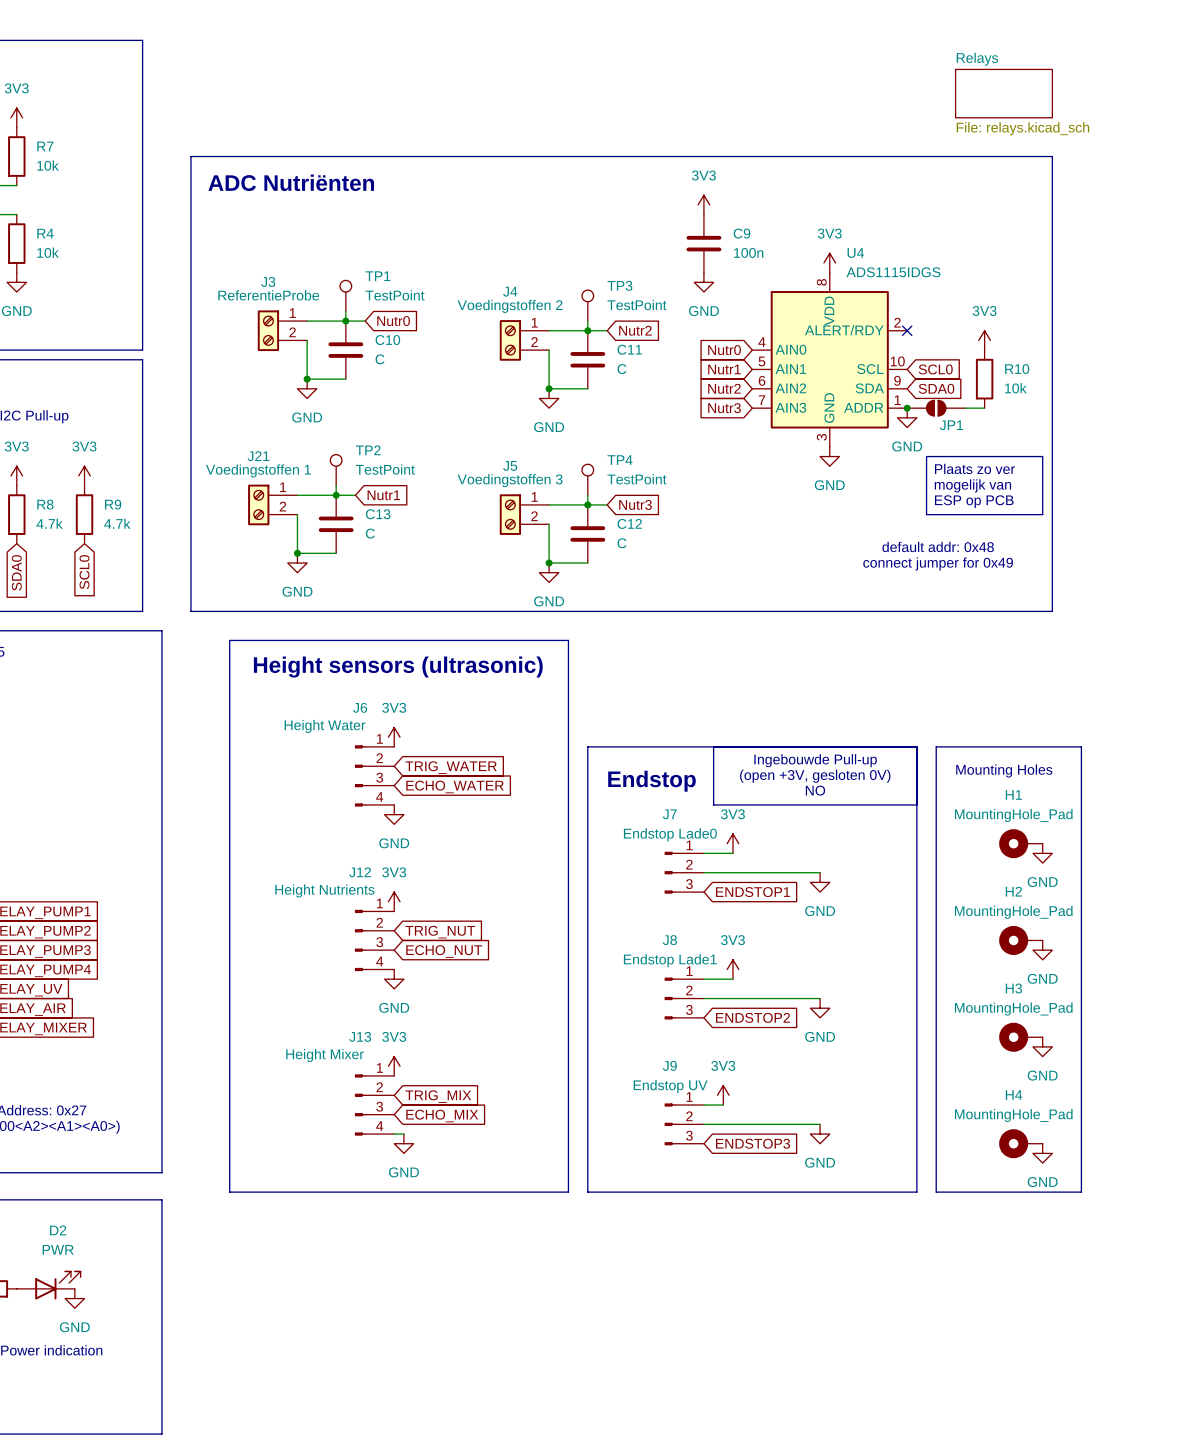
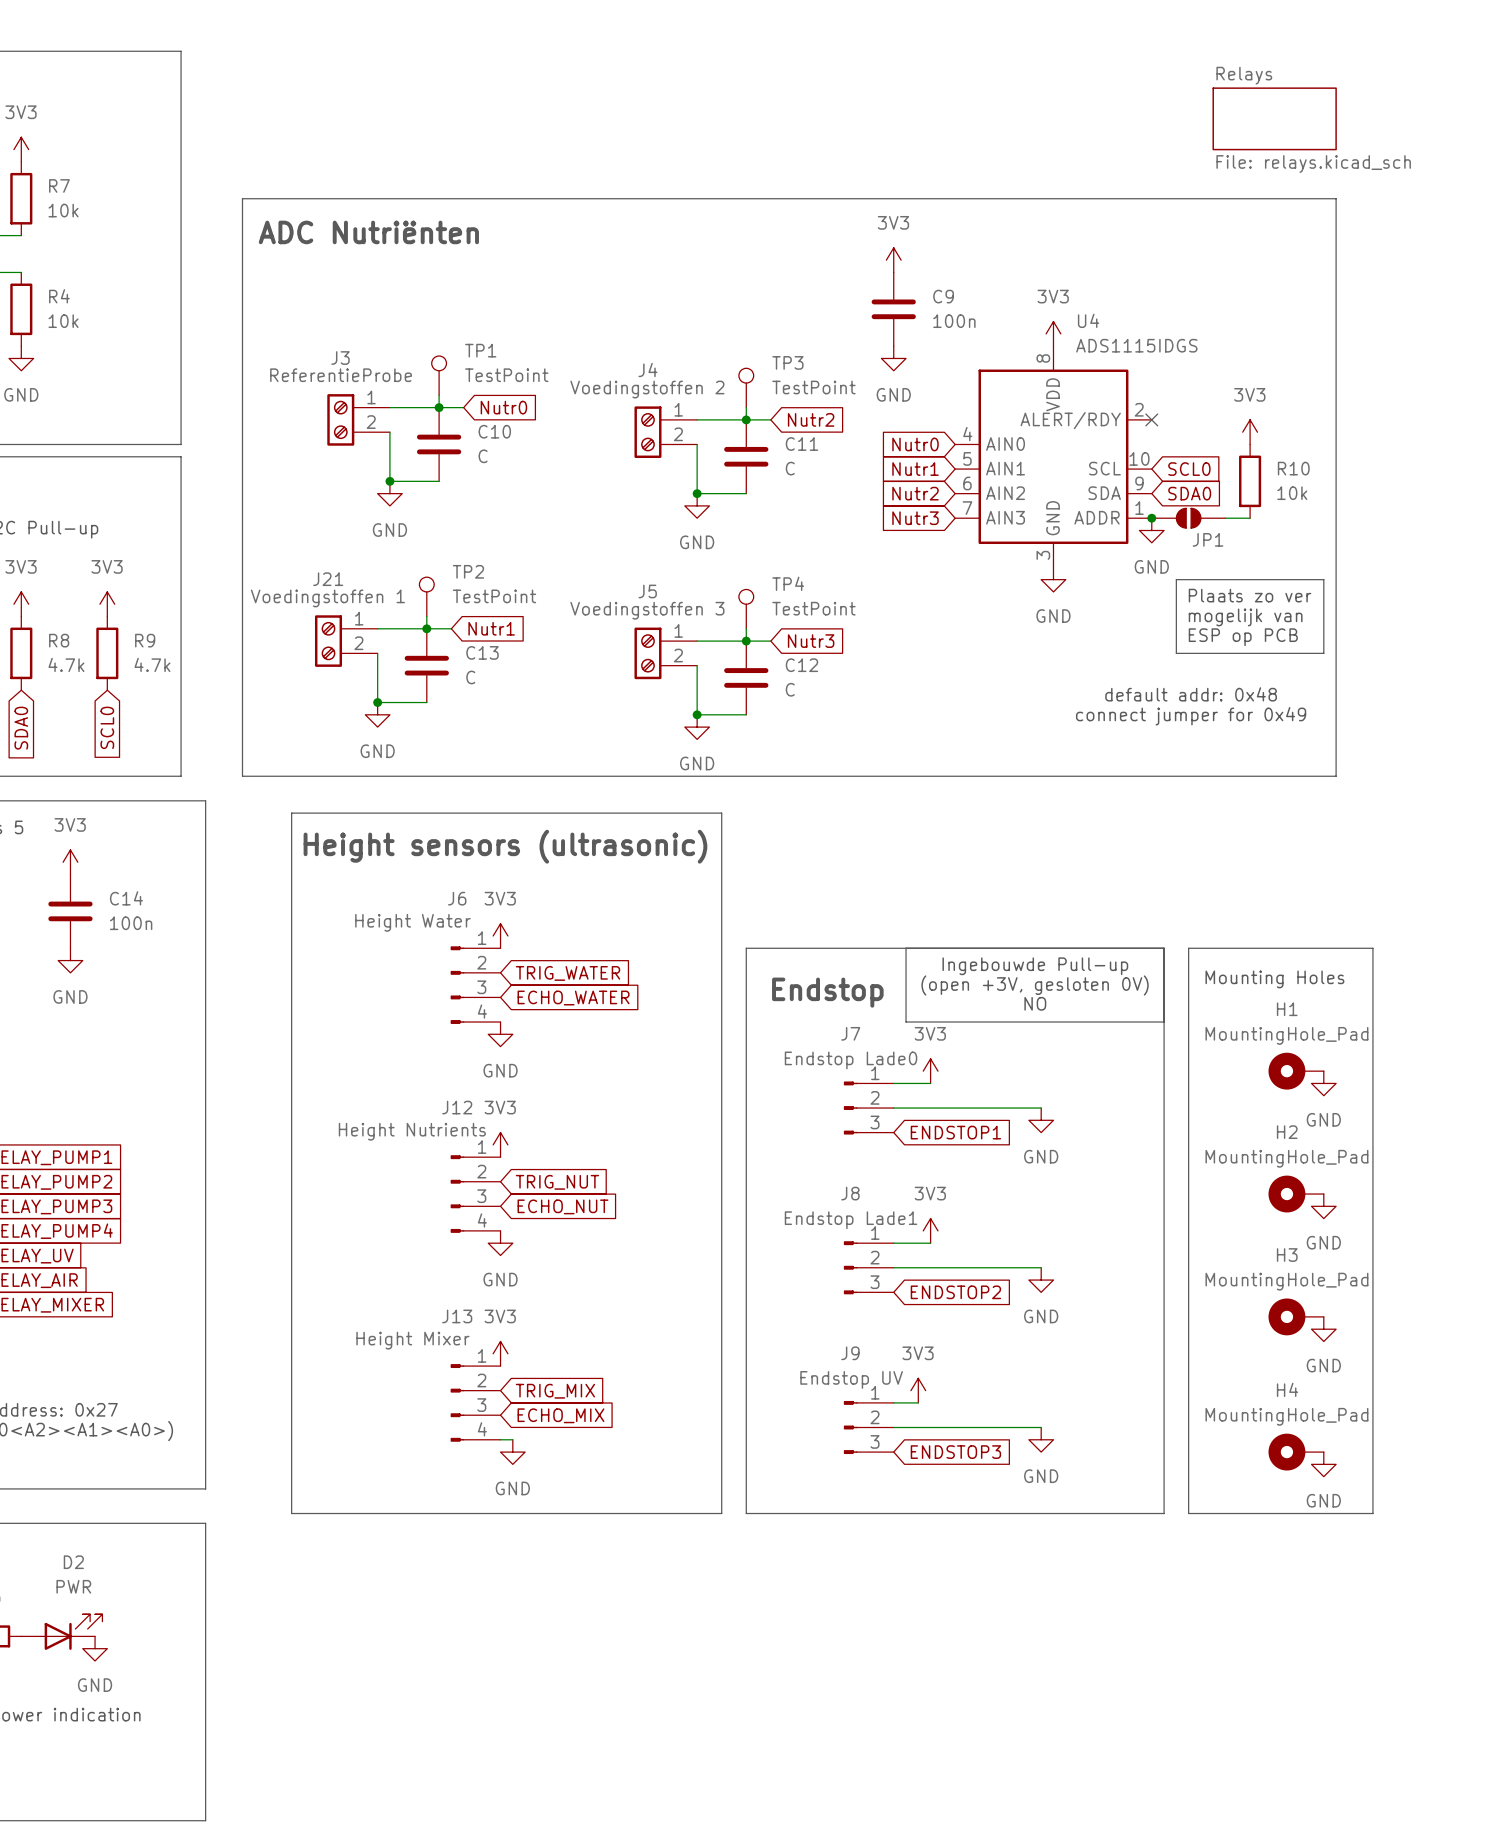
power symbol: none -> 3V3 (70, 862)
C14: none -> 100n (70, 911)
power symbol: none -> GND (70, 960)

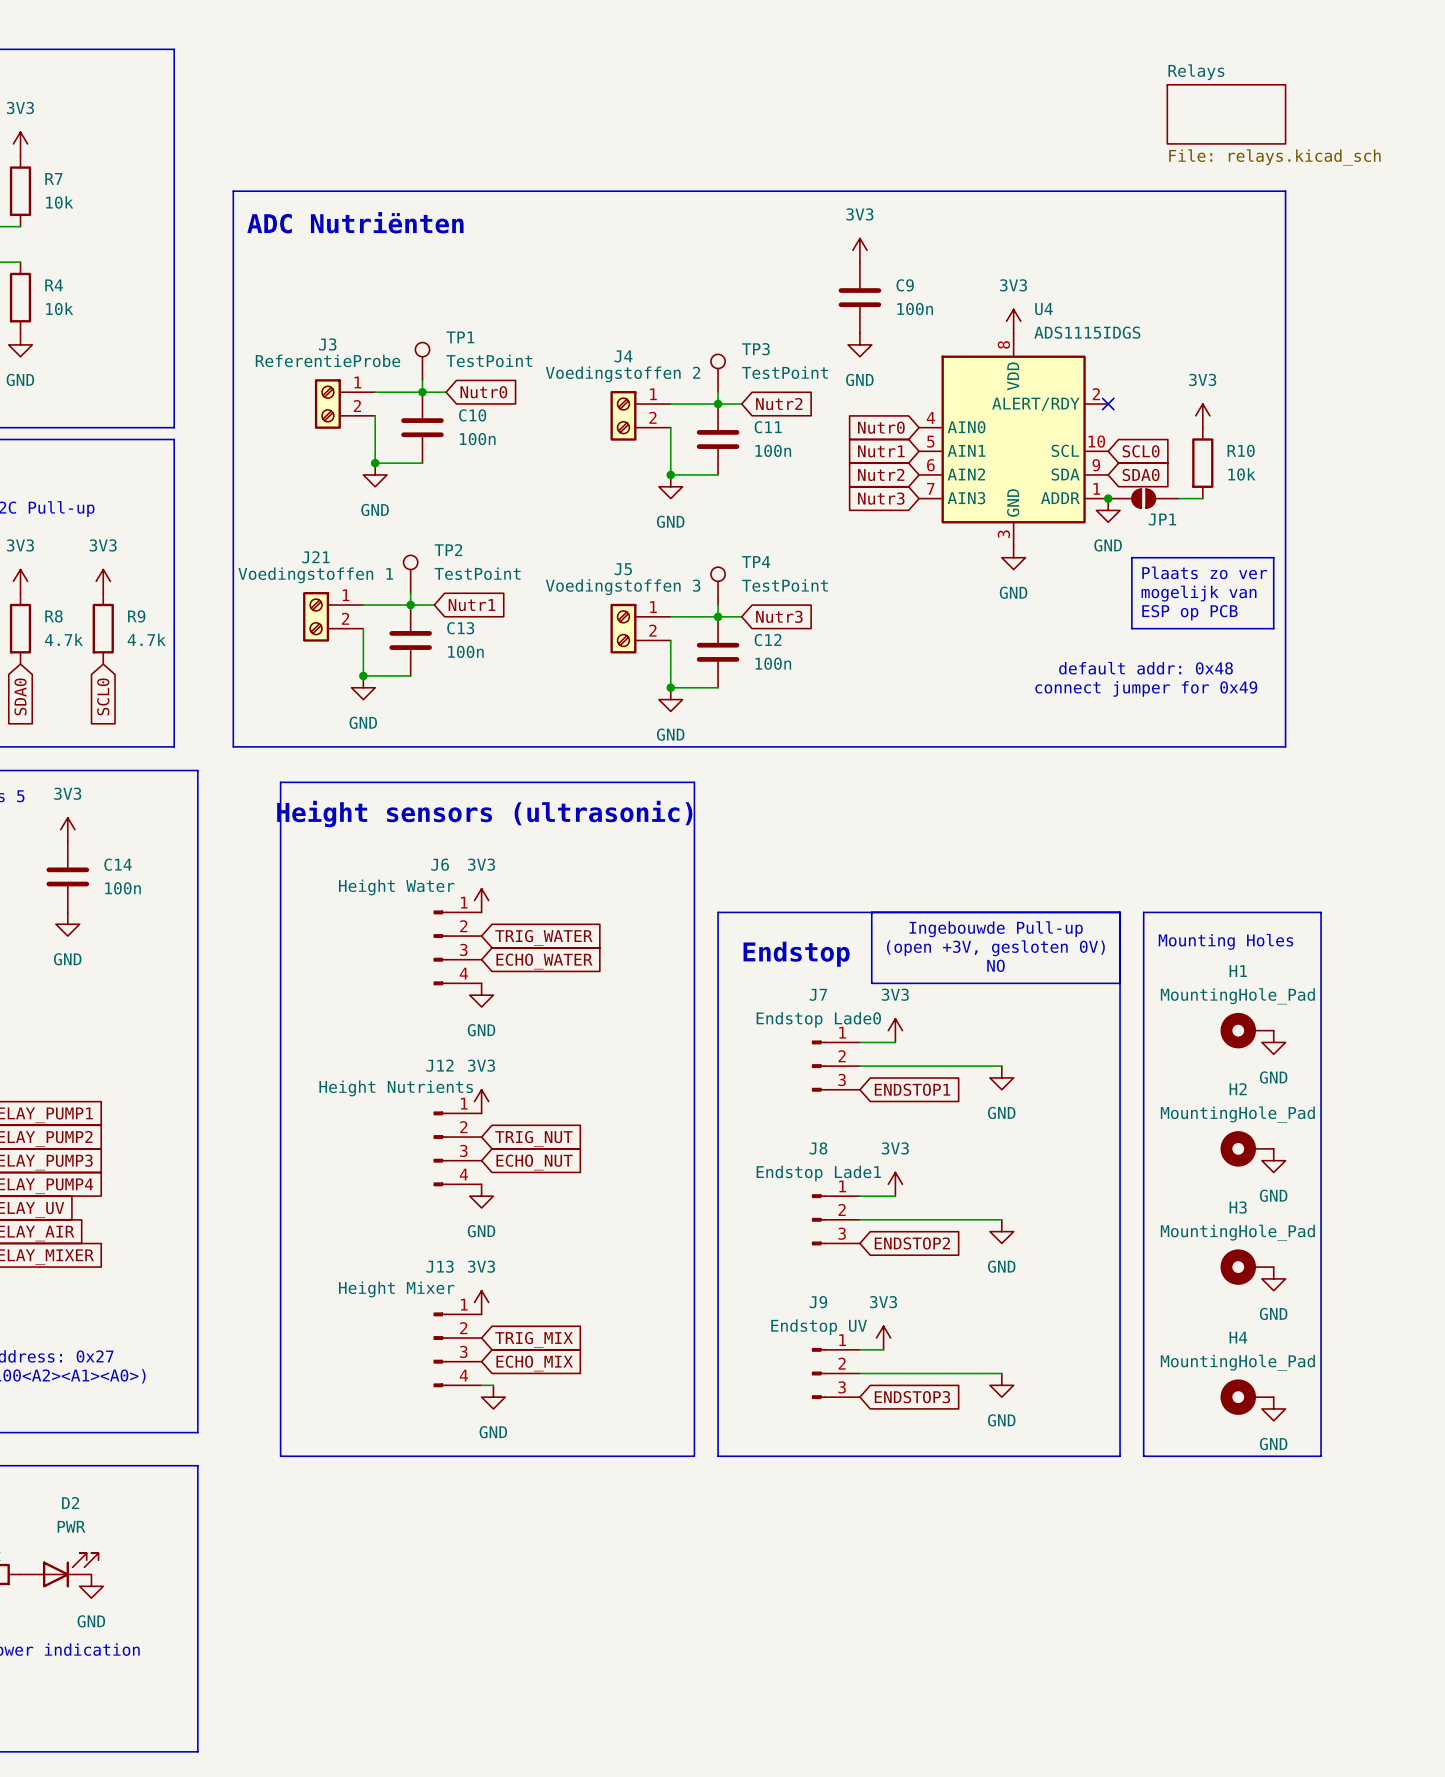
C10 value: C (483, 456) -> 100n (477, 439)
C11 value: C (790, 468) -> 100n (773, 450)
C13 value: C (470, 677) -> 100n (465, 651)
C12 value: C (790, 689) -> 100n (773, 663)

